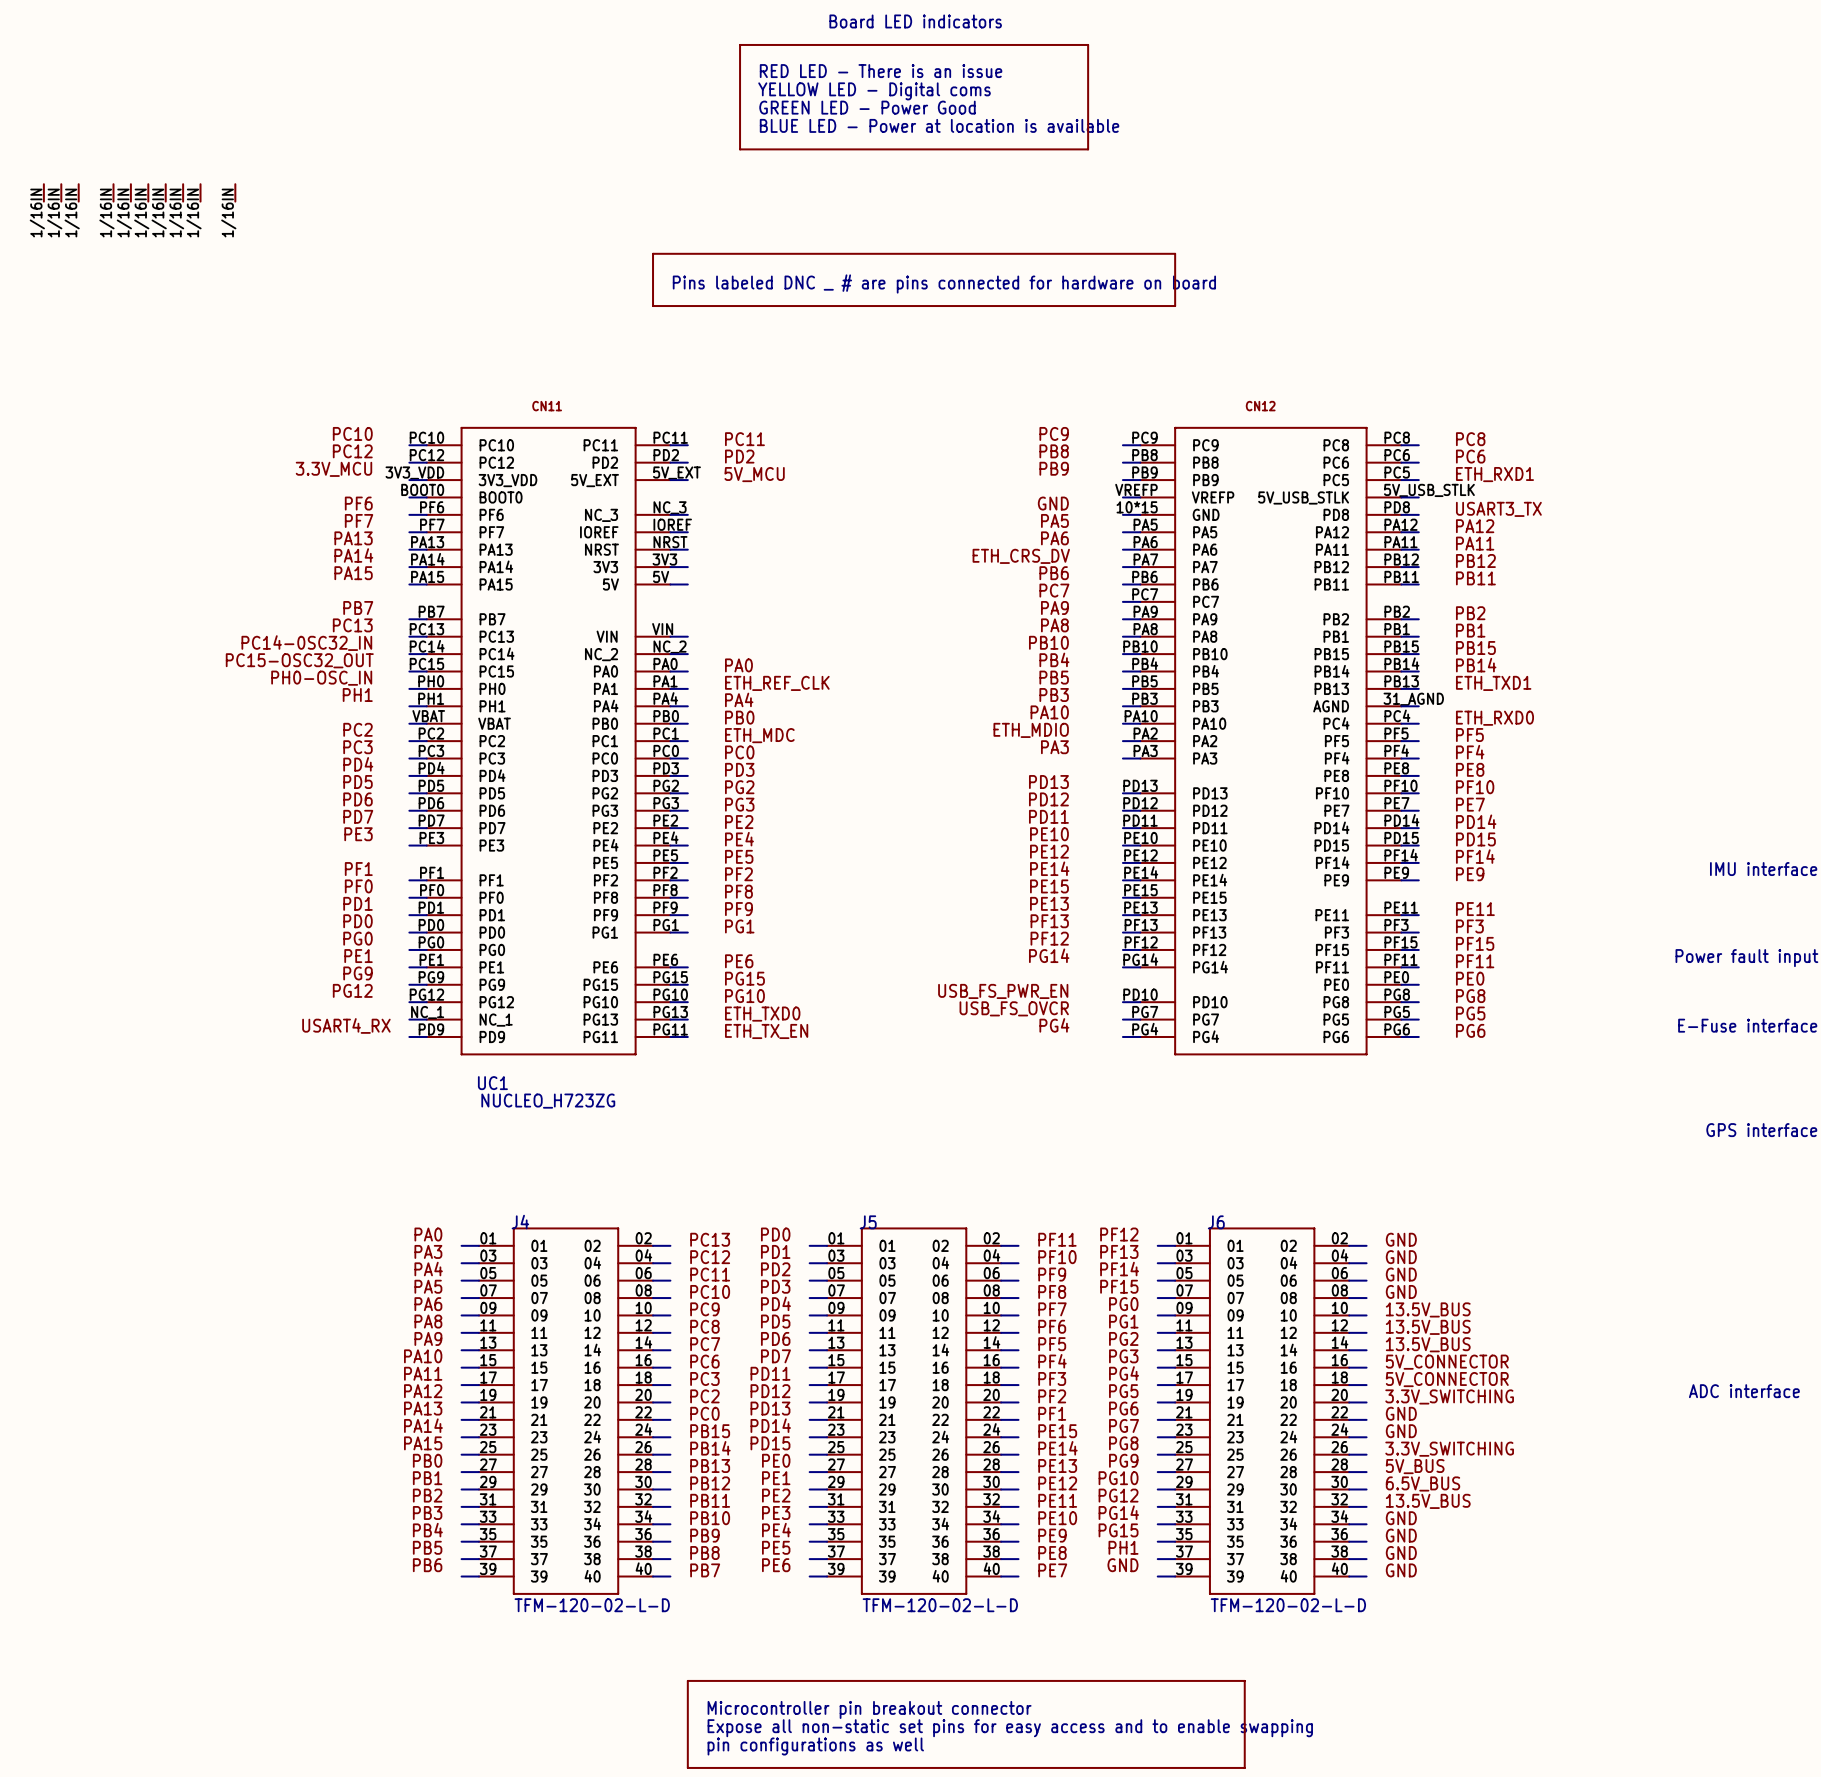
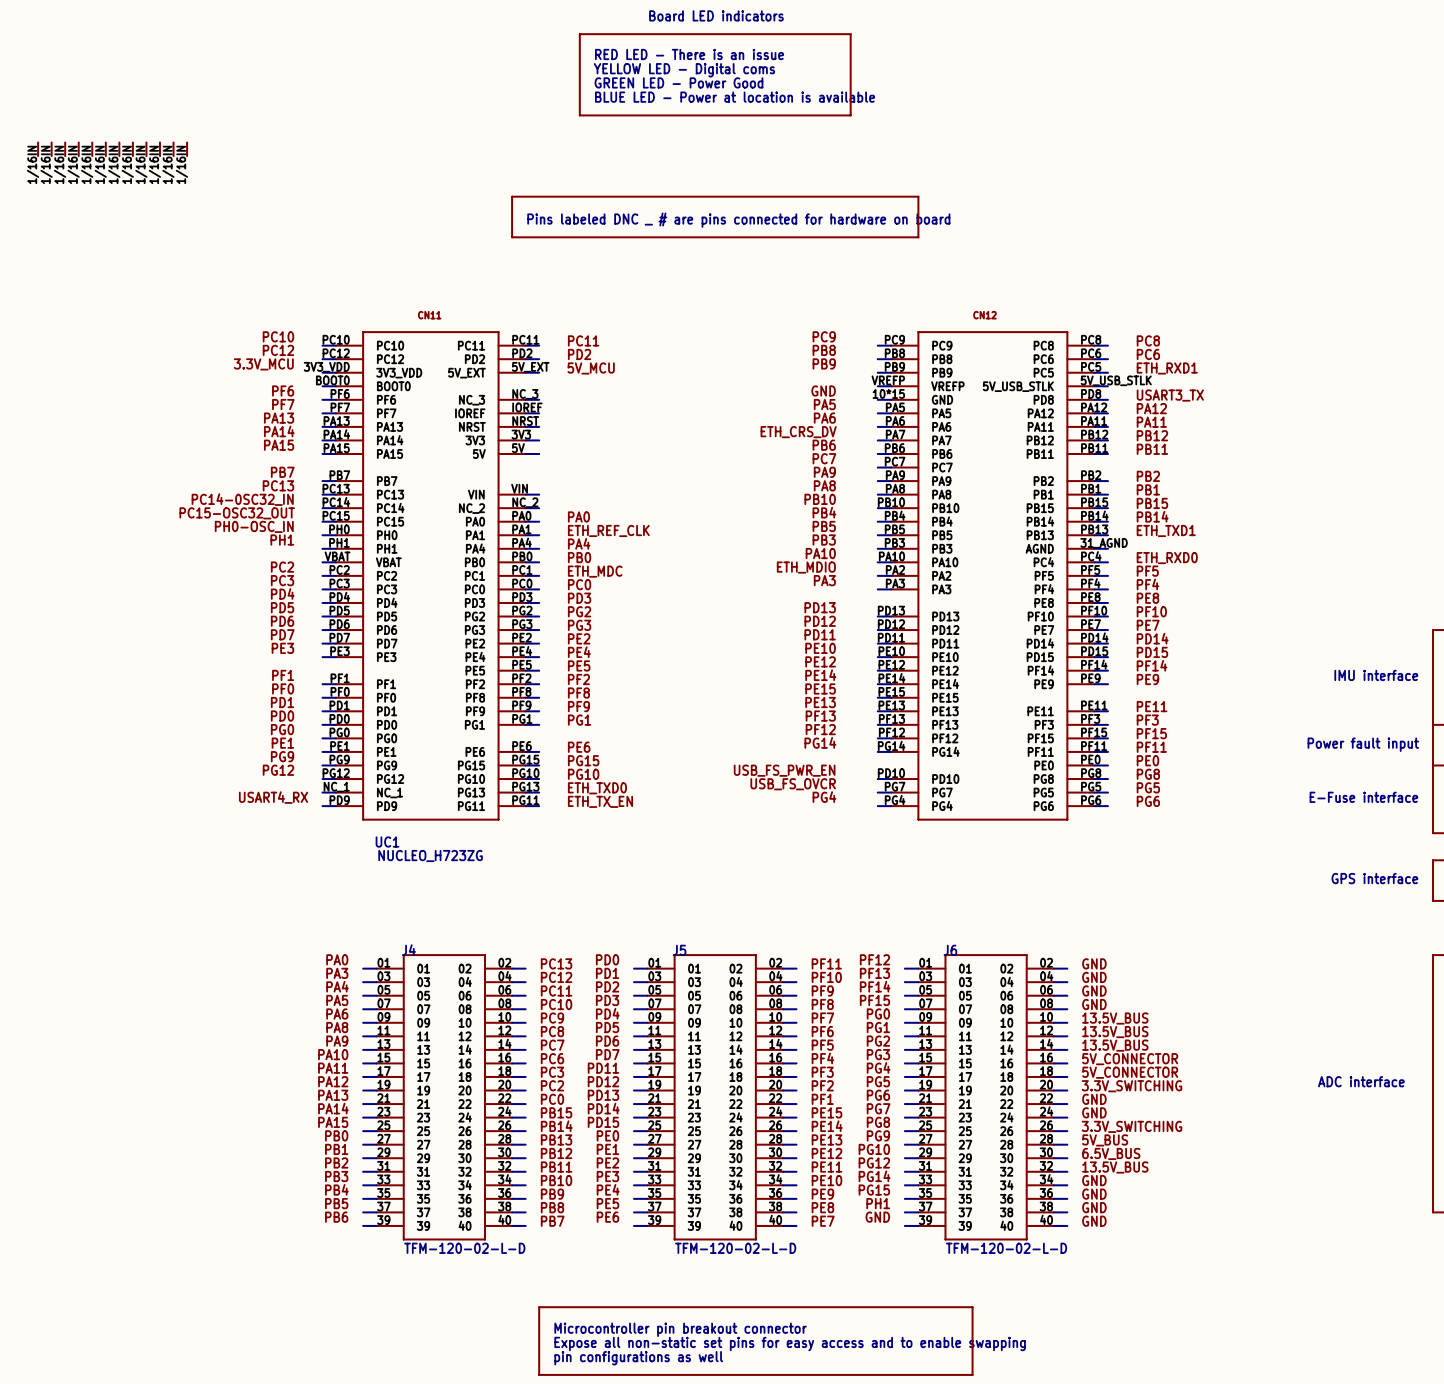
part: none -> (78, 149)
part: none -> (173, 149)

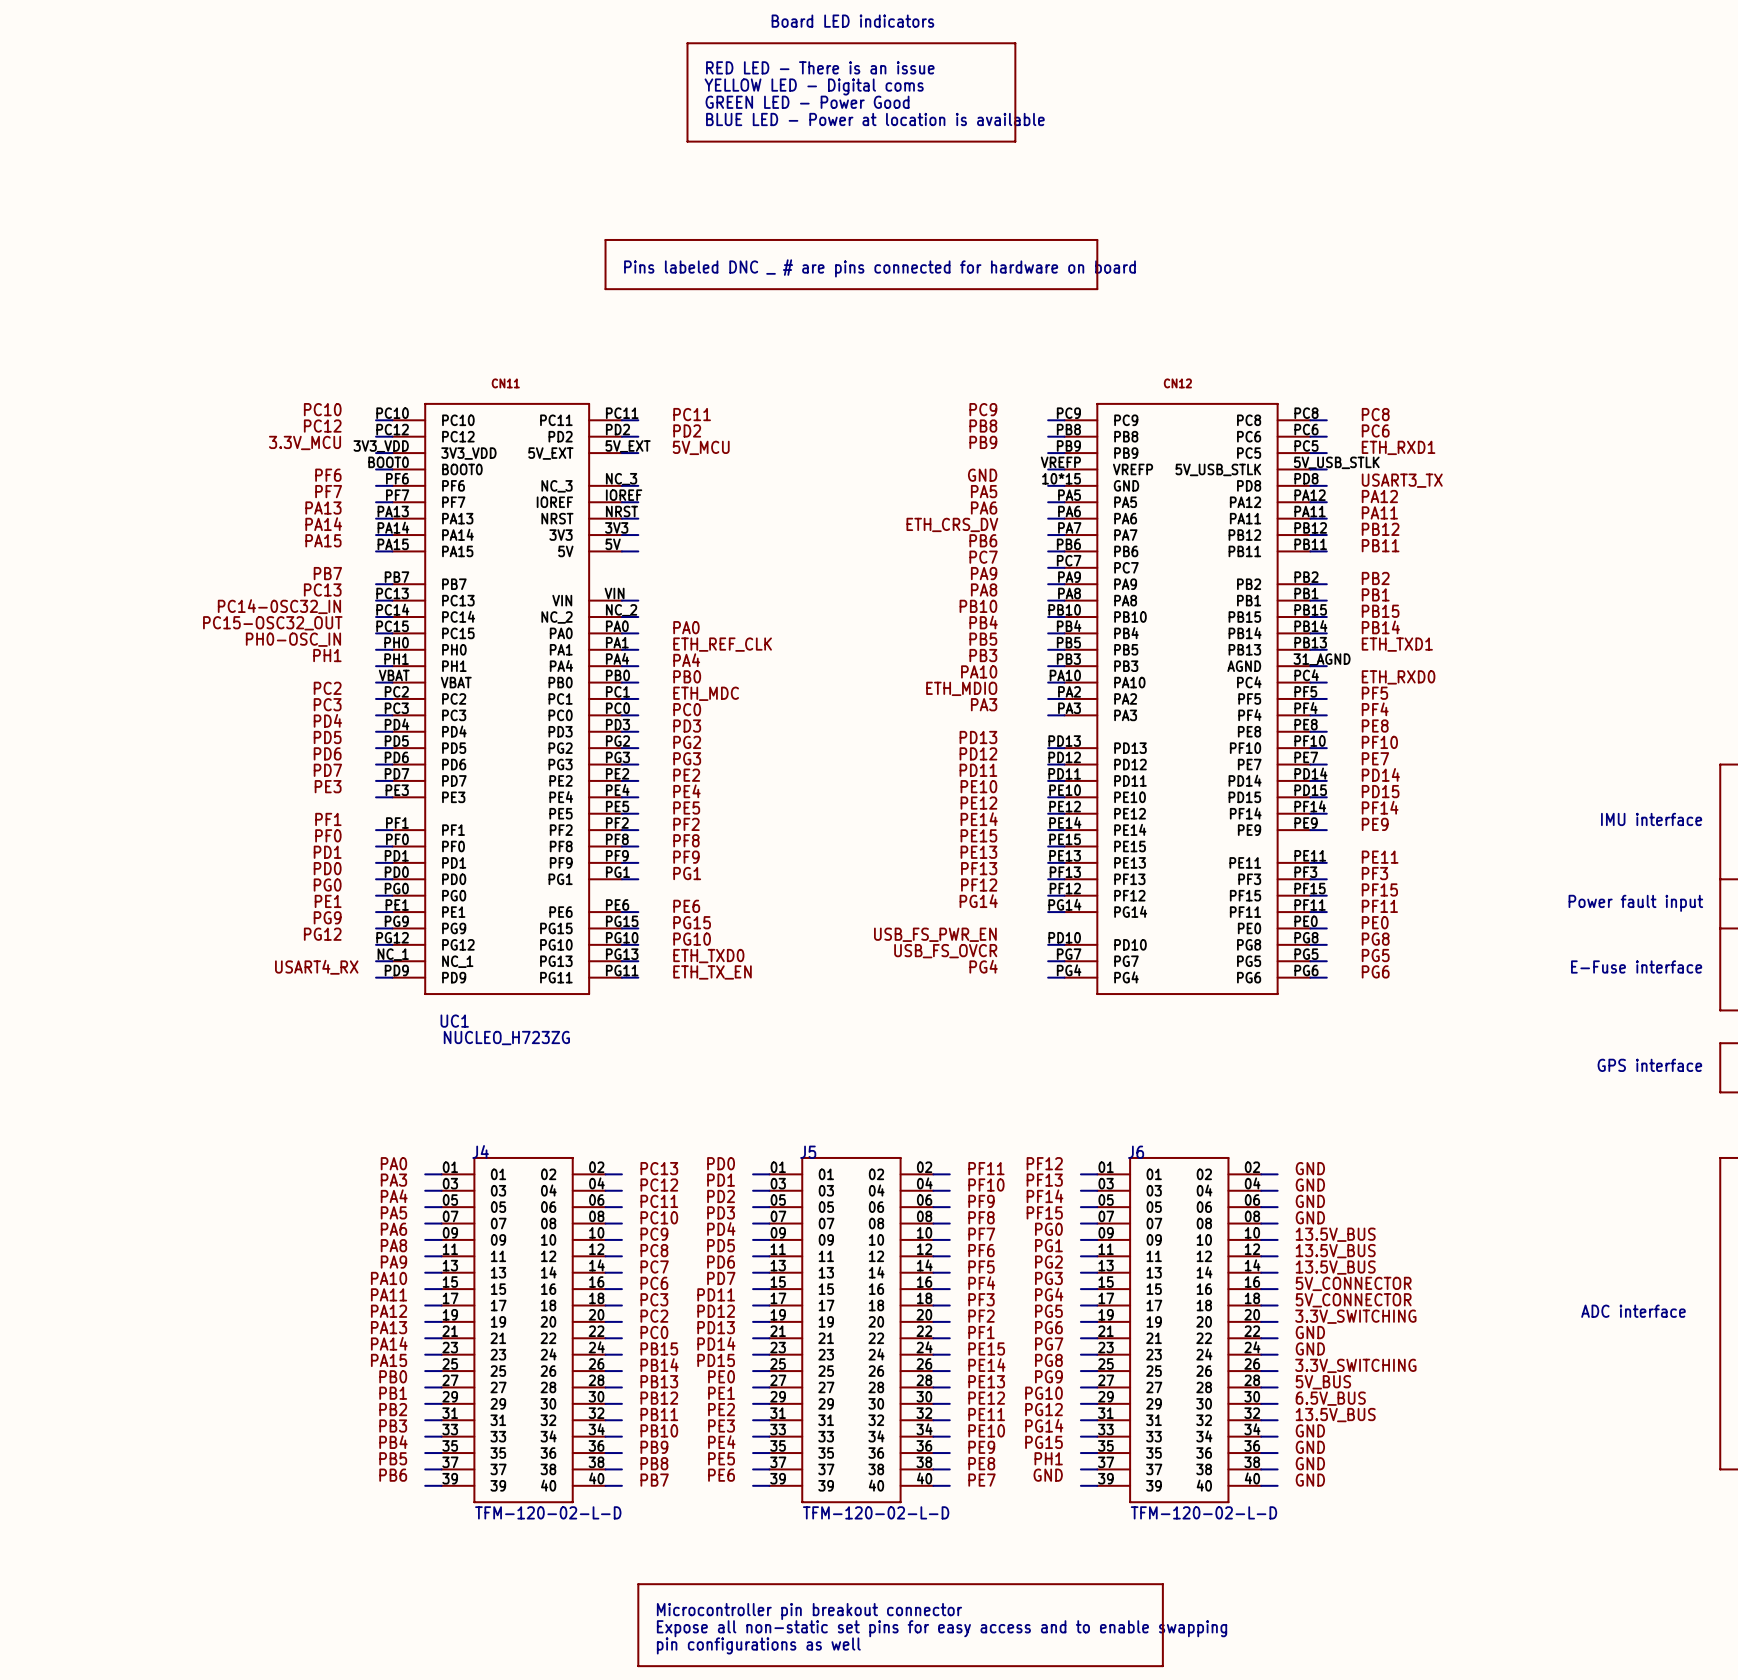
part: (38, 149) -> none
part: (51, 149) -> none
part: (65, 149) -> none
part: (78, 149) -> none
part: (92, 149) -> none
part: (105, 149) -> none
part: (119, 149) -> none
part: (132, 149) -> none
part: (146, 149) -> none
part: (159, 149) -> none
part: (173, 149) -> none
part: (187, 149) -> none

